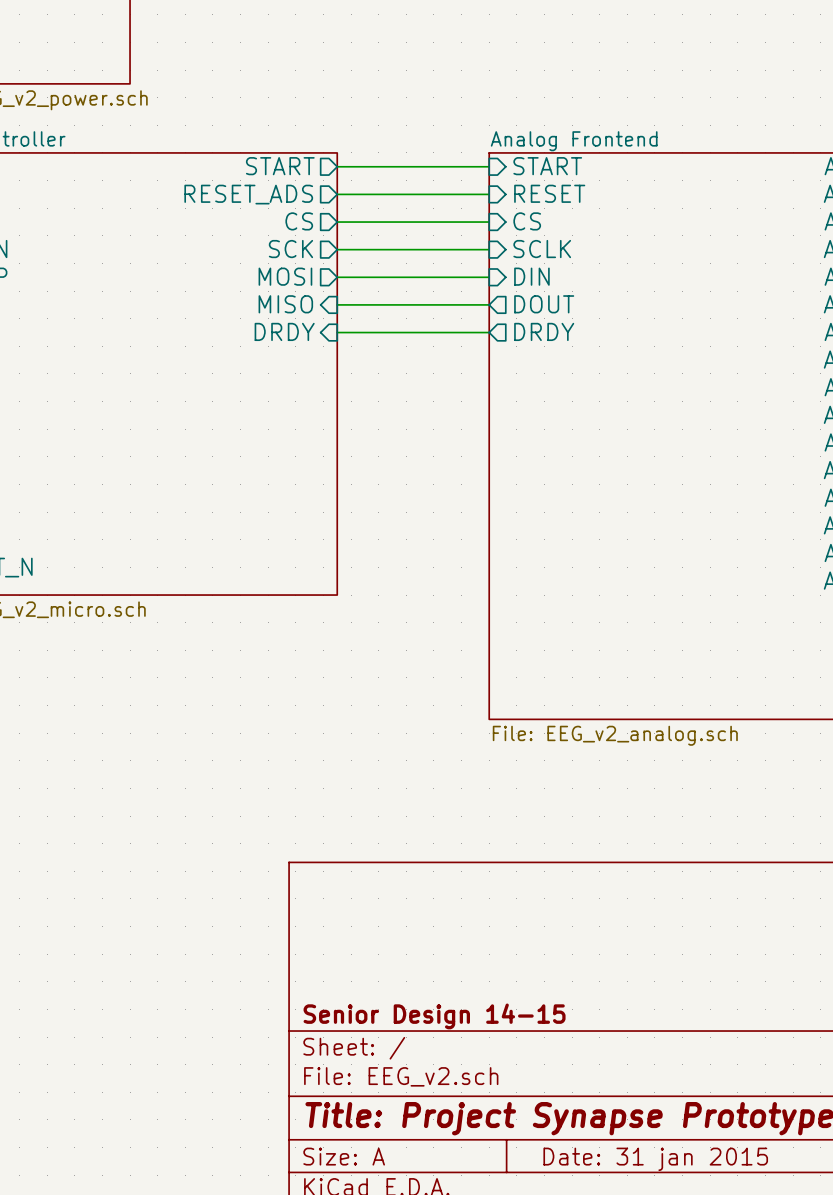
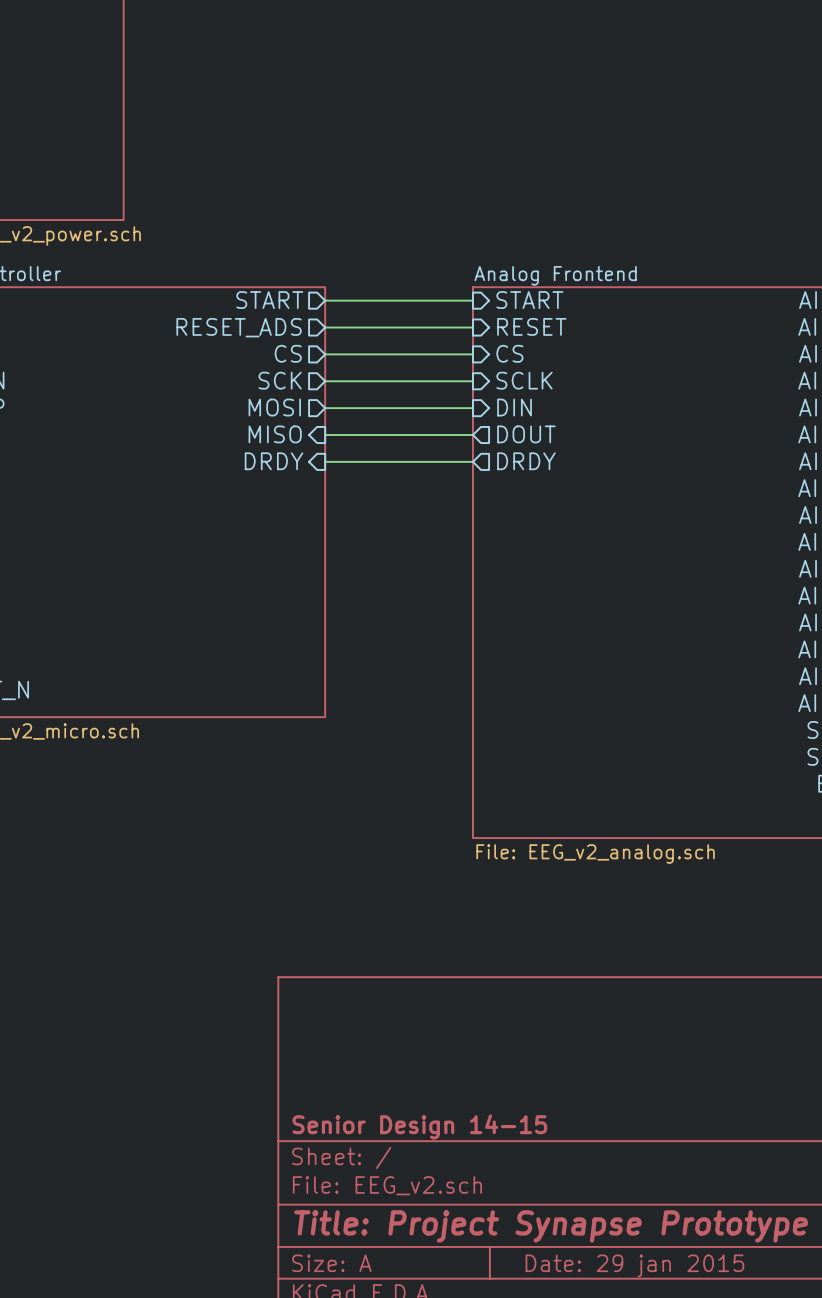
title block: Date: 31 jan 2015 (655, 1159) -> Date: 29 jan 2015 (634, 1265)

